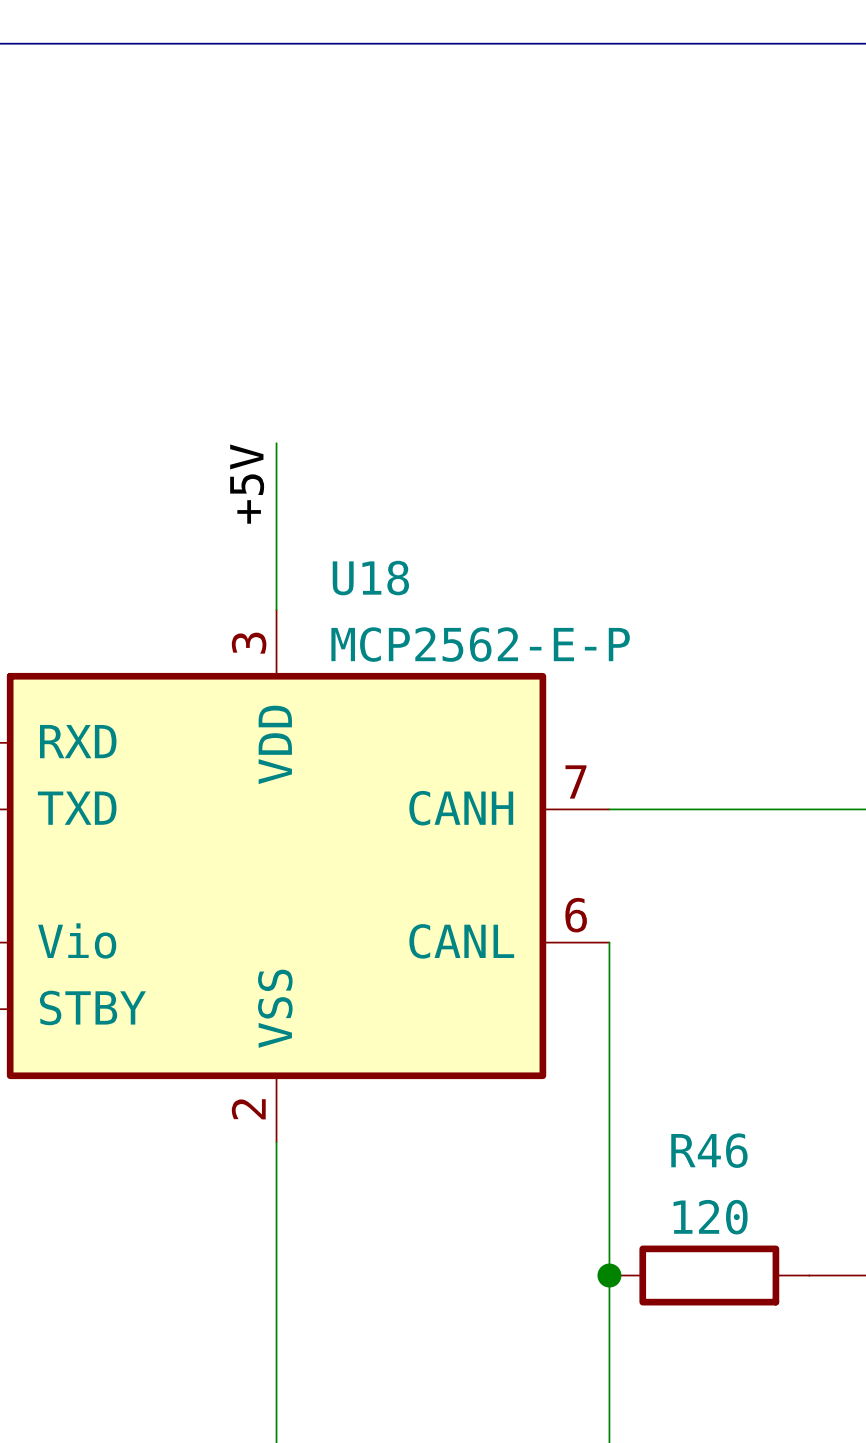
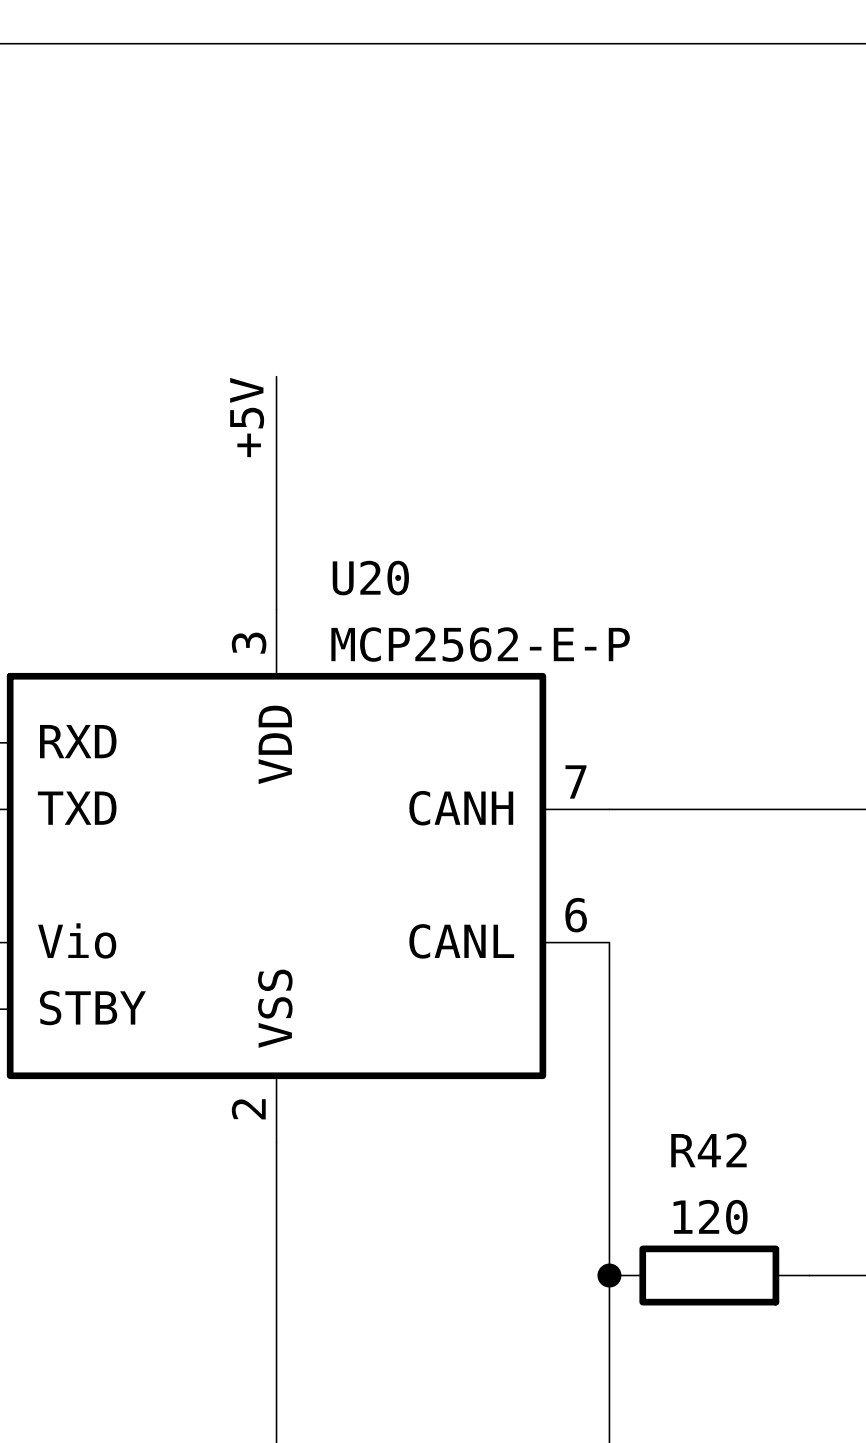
wire: none -> (276, 376) (276, 443)
label position: +5V (247, 484) -> +5V (247, 417)
U18 name: U18 (370, 578) -> U20 (370, 578)
R46 name: R46 (709, 1150) -> R42 (708, 1150)

